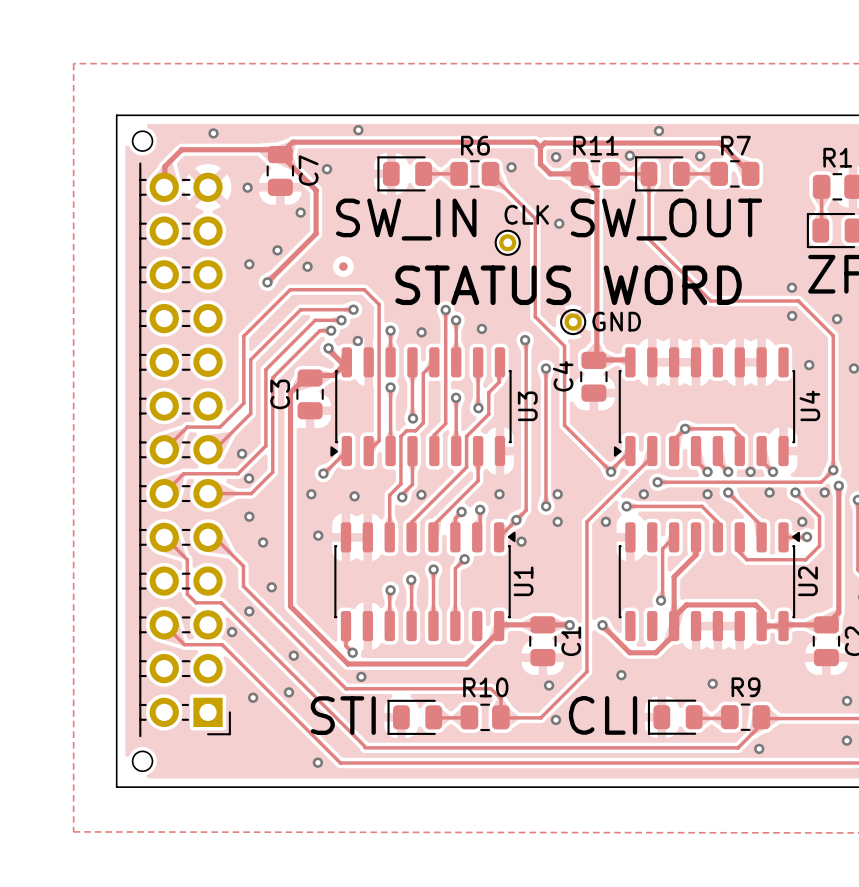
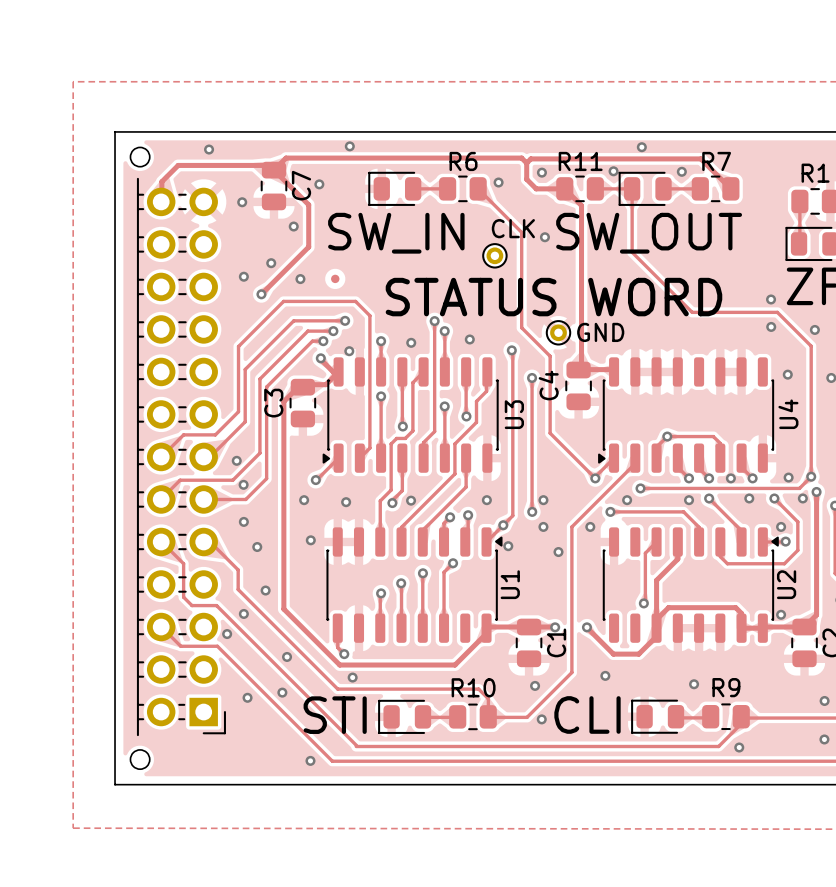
via: none -> (788, 477)
via: none -> (558, 552)
via: none -> (781, 614)

